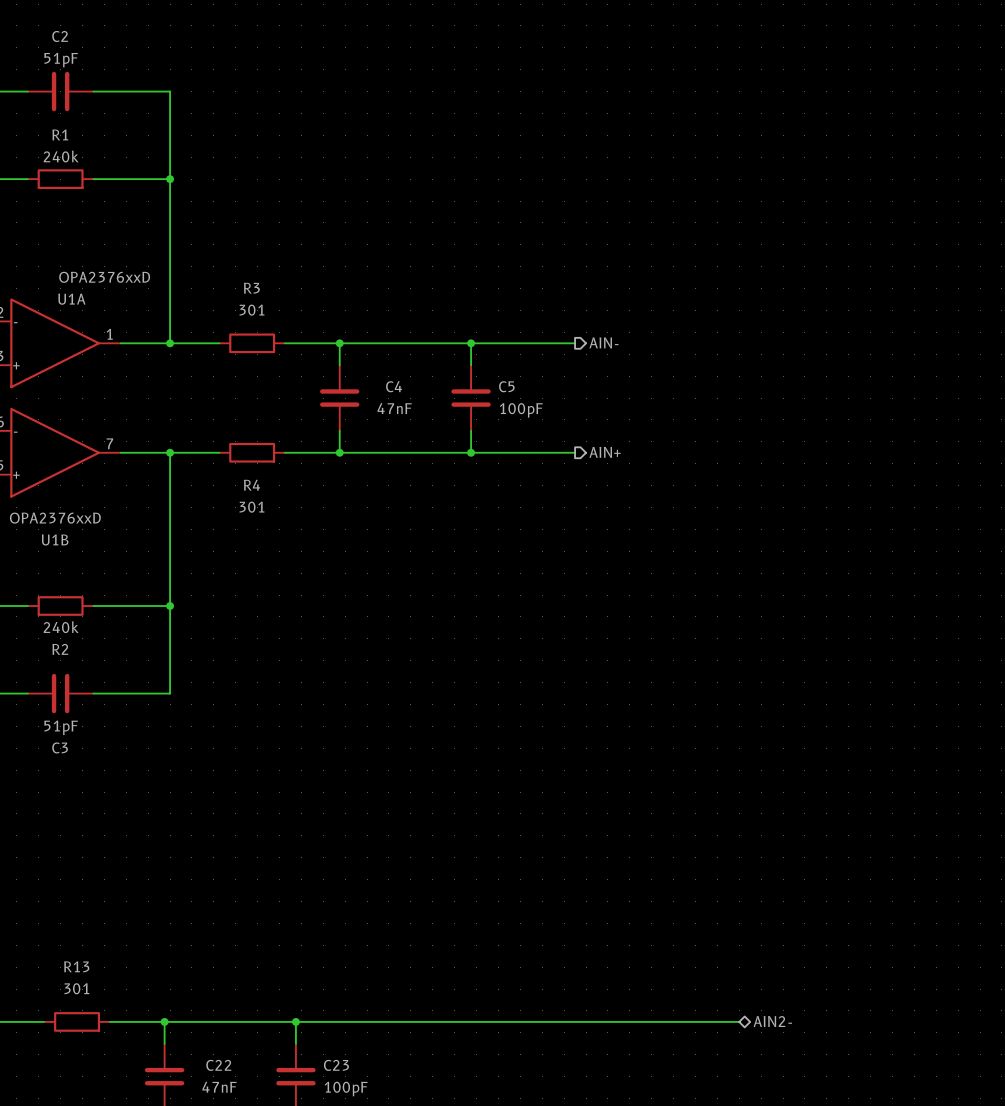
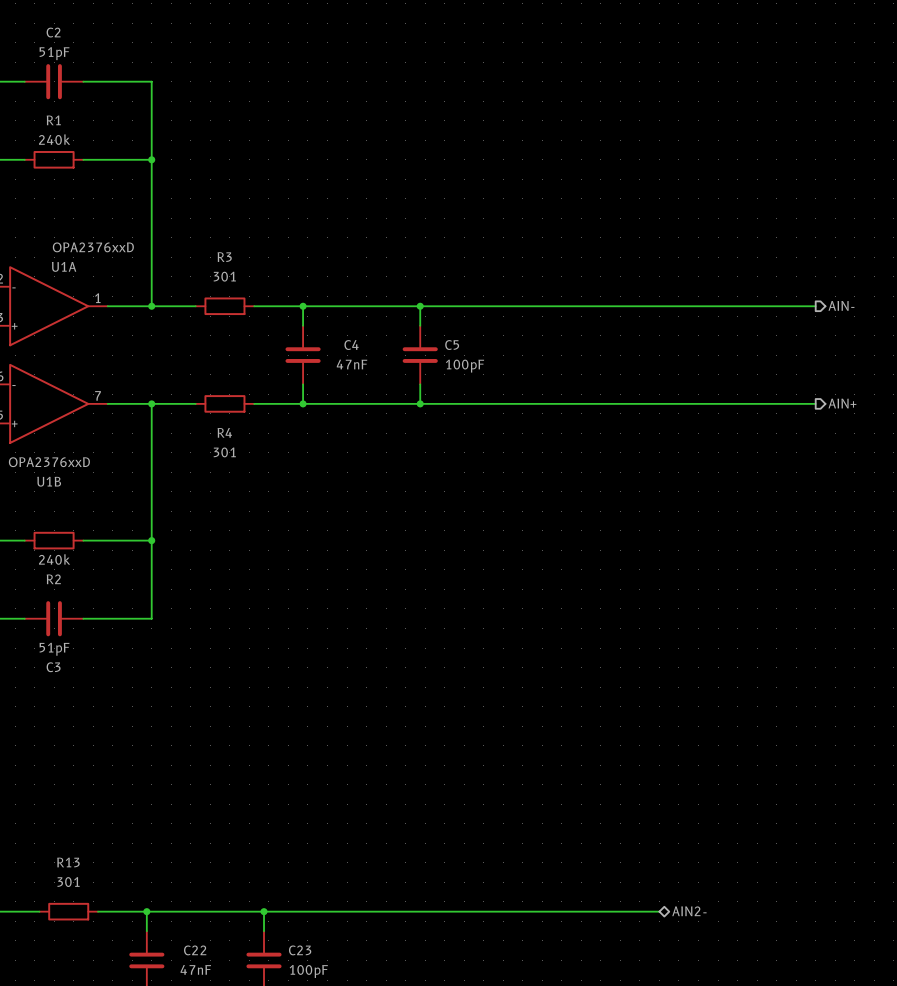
hierarchical label: AIN- (603, 342) -> none
hierarchical label: none -> AIN- (841, 305)
wire: none -> (513, 306) (815, 306)
wire: none -> (513, 403) (815, 403)
hierarchical label: AIN+ (605, 452) -> none
hierarchical label: none -> AIN+ (842, 403)

